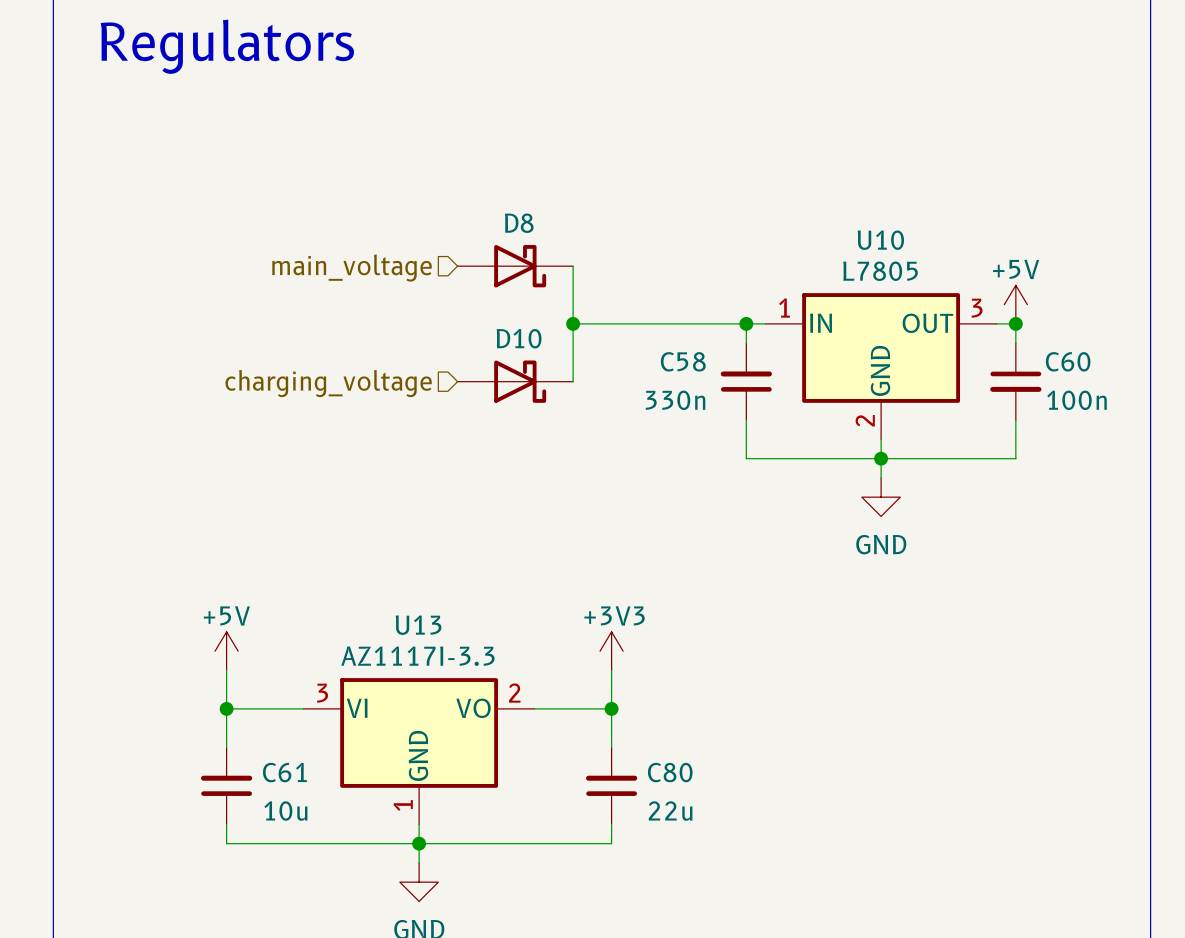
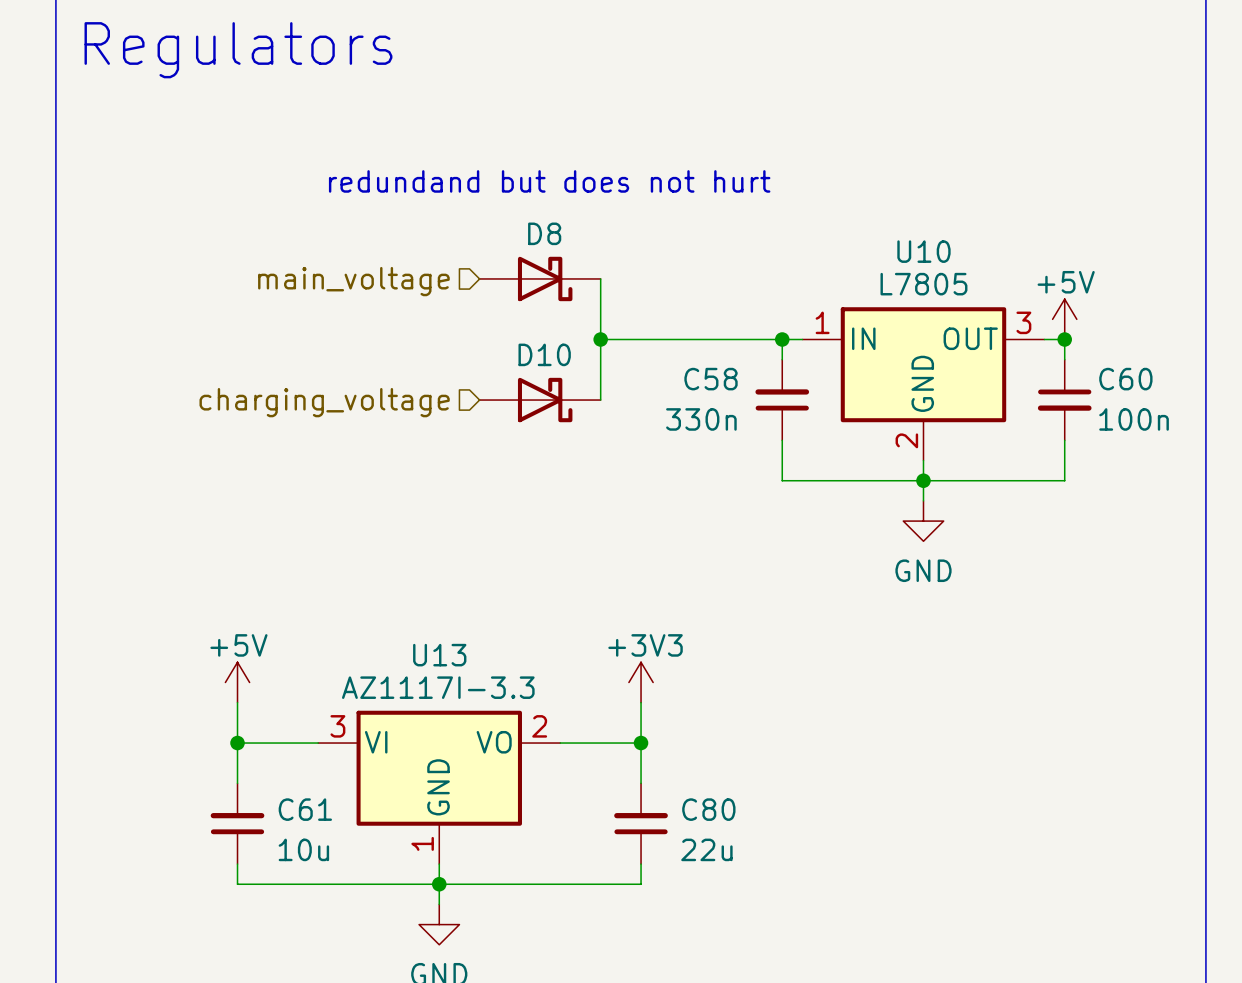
text: none -> redundand but does not hurt (549, 181)

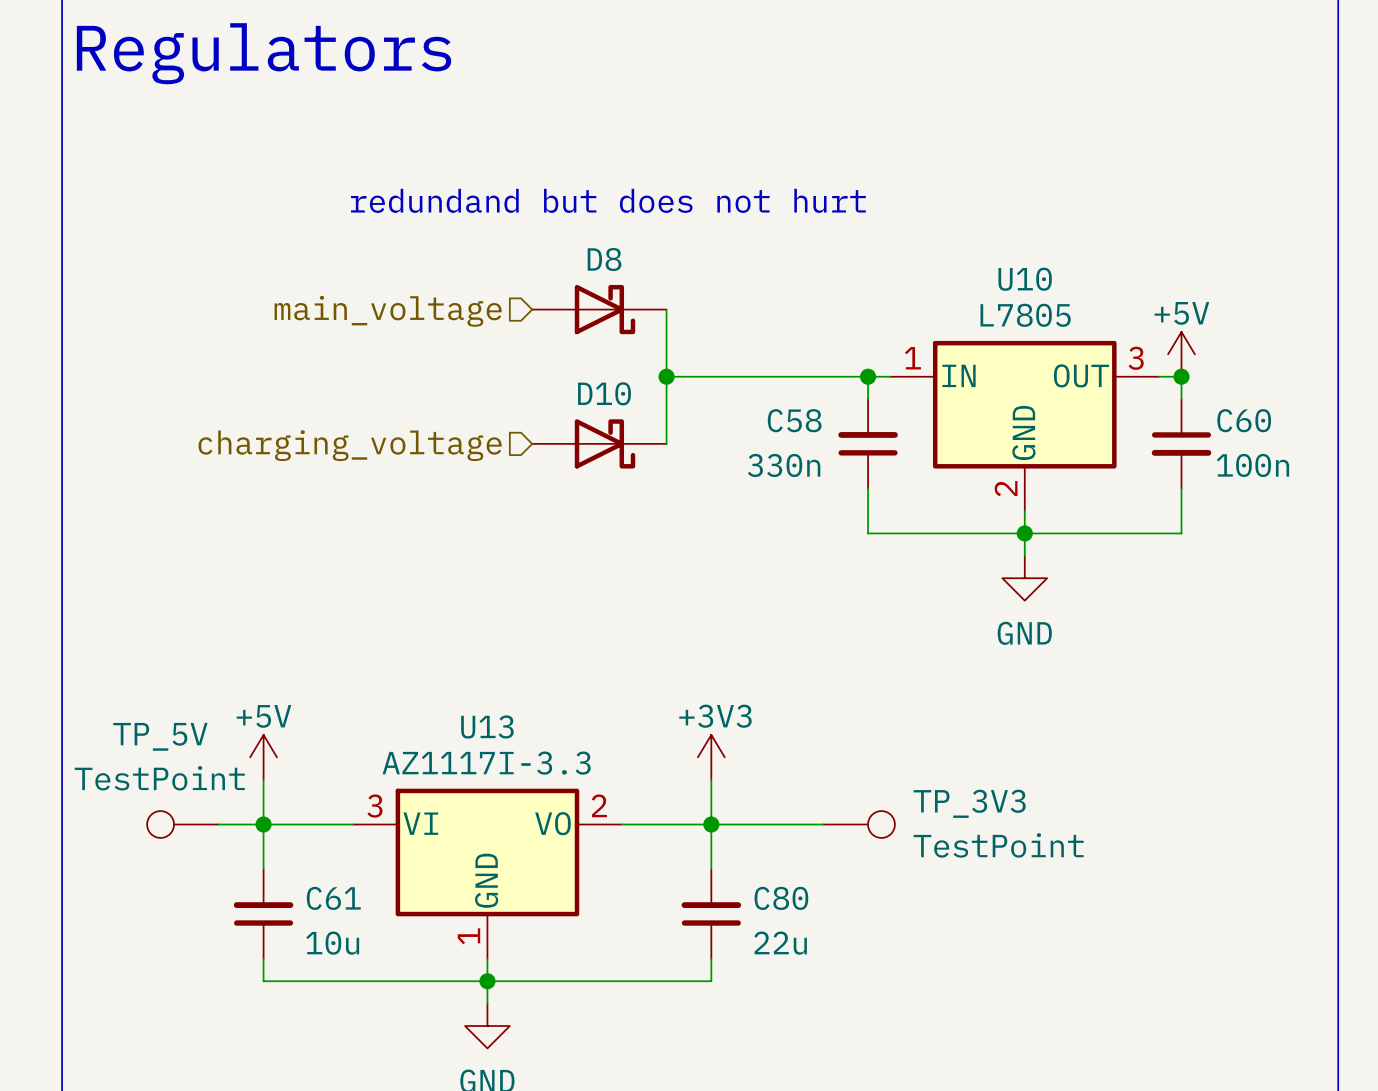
TP_5V: none -> TestPoint (182, 824)
wire: none -> (218, 824) (263, 824)
wire: none -> (711, 824) (823, 824)
TP_3V3: none -> TestPoint (859, 824)

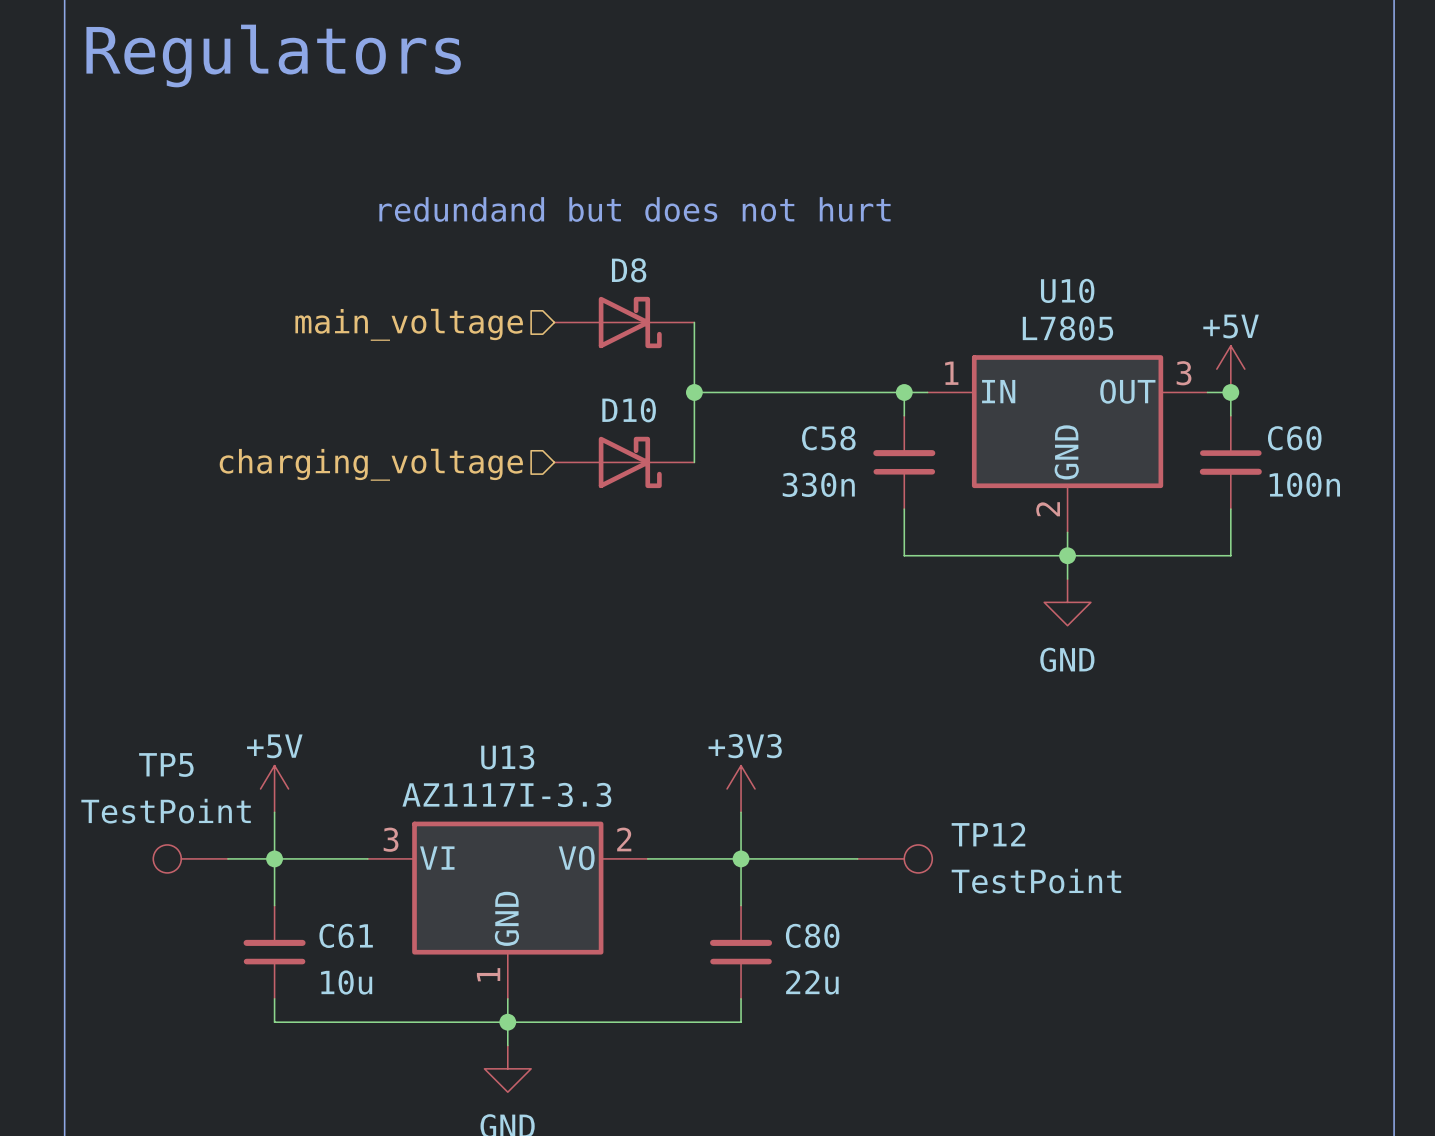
TP_5V name: TP_5V (160, 736) -> TP5 (166, 764)
TP_3V3 name: TP_3V3 (969, 803) -> TP12 (988, 834)

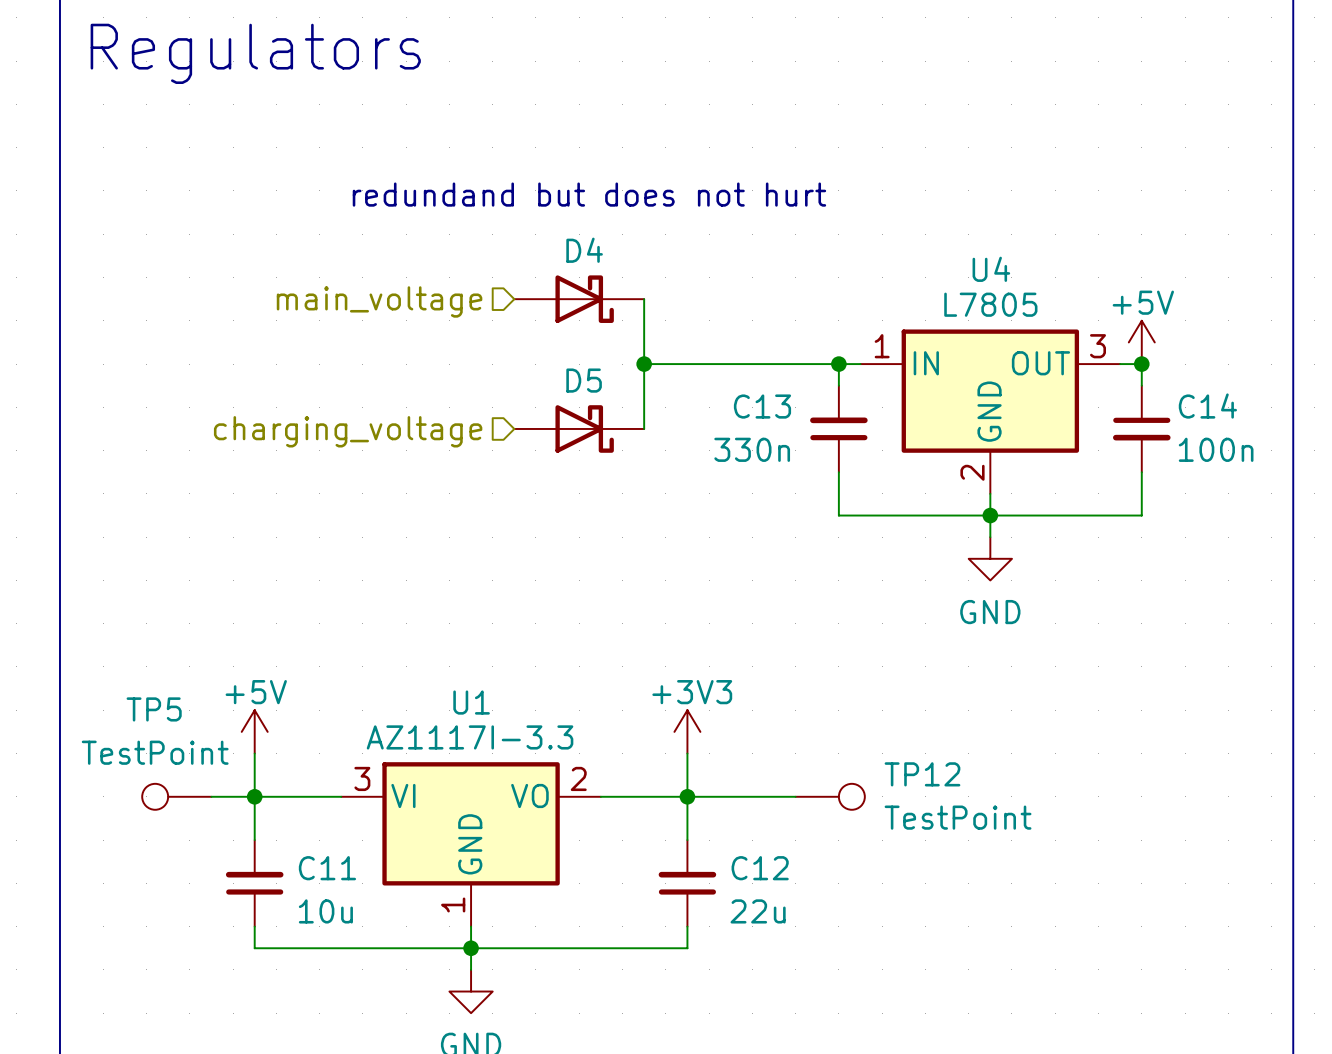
D8 name: D8 (629, 270) -> D4 (584, 250)
U10 name: U10 (1067, 290) -> U4 (991, 269)
D10 name: D10 (629, 410) -> D5 (584, 380)
C58 name: C58 (828, 438) -> C13 (762, 406)
C60 name: C60 (1294, 438) -> C14 (1207, 406)
U13 name: U13 (507, 757) -> U1 (471, 702)
C61 name: C61 (346, 935) -> C11 (327, 868)
C80 name: C80 (812, 935) -> C12 (760, 868)

